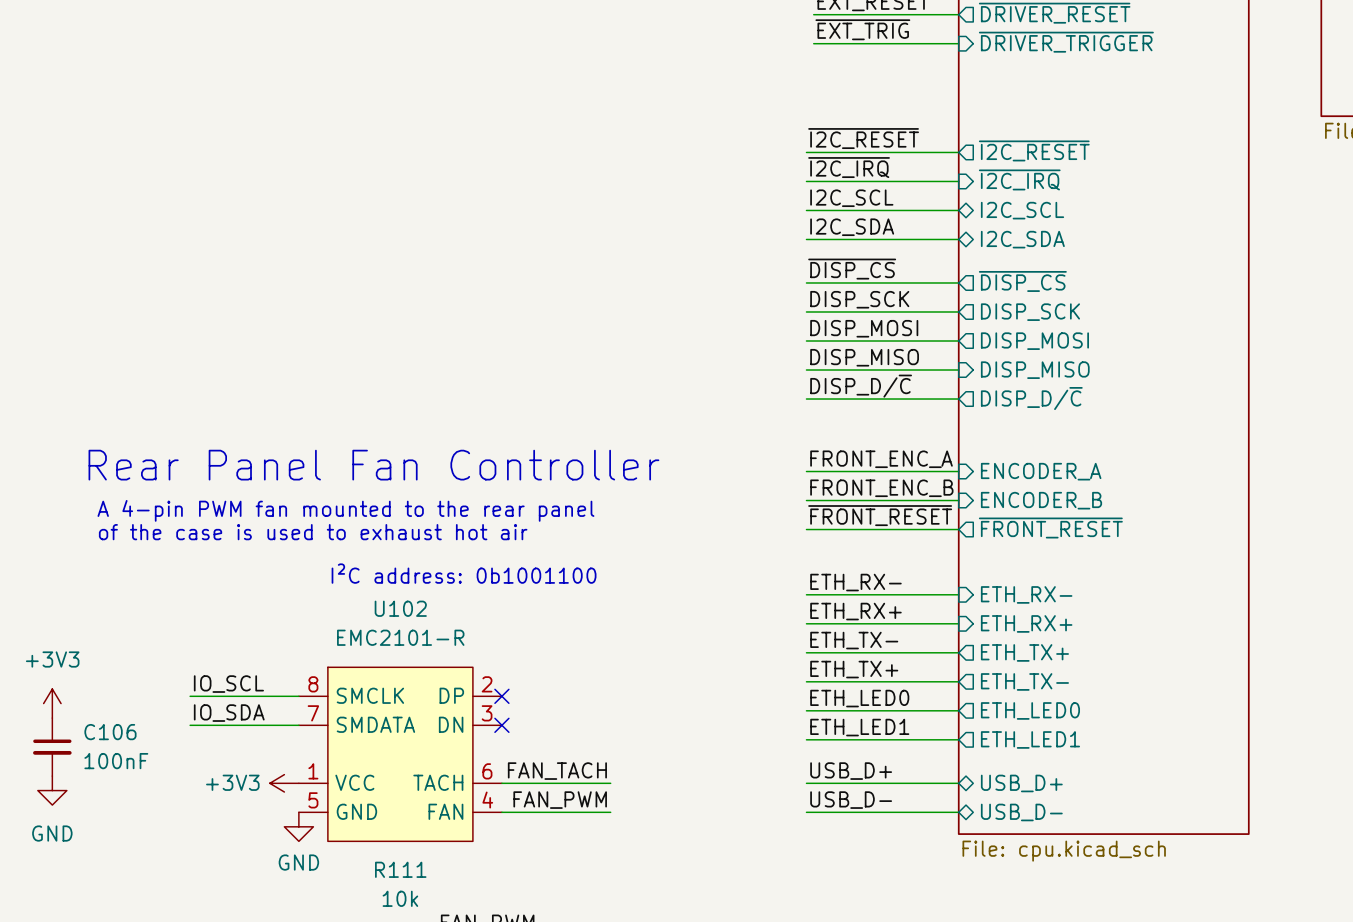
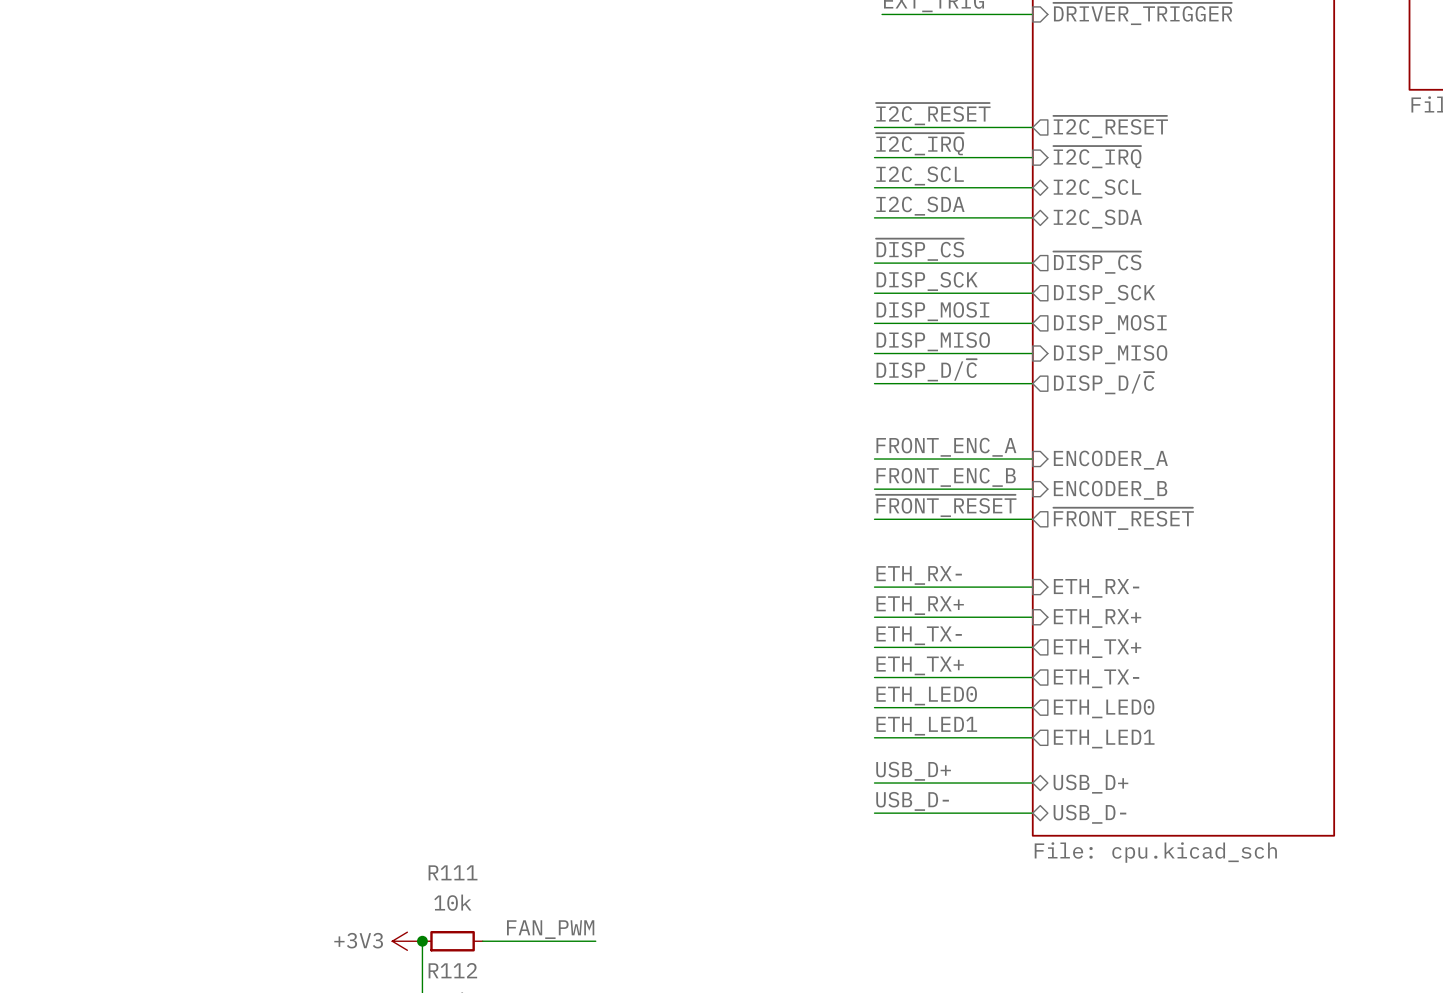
text: Rear Panel Fan Controller (373, 465) -> none
text: A 4-pin PWM fan mounted to the rear panel (345, 510) -> none
text: of the case is used to exhaust hot air (313, 532) -> none
text: I²C address: 0b1001100 (464, 573) -> none
label: IO_SCL (228, 684) -> none
wire: (190, 696) (298, 696) -> none
no-connect mark: (501, 696) -> none
power symbol: +3V3 (52, 703) -> none
label: IO_SDA (229, 713) -> none
wire: (190, 725) (298, 725) -> none
no-connect mark: (501, 725) -> none
C106: 100nF (52, 747) -> none
U102: EMC2101-R (400, 754) -> none
label: FAN_TACH (557, 771) -> none
power symbol: +3V3 (284, 783) -> none
wire: (501, 783) (610, 783) -> none
power symbol: GND (52, 790) -> none
label: FAN_PWM (560, 800) -> none
wire: (501, 812) (610, 812) -> none
power symbol: GND (298, 826) -> none

